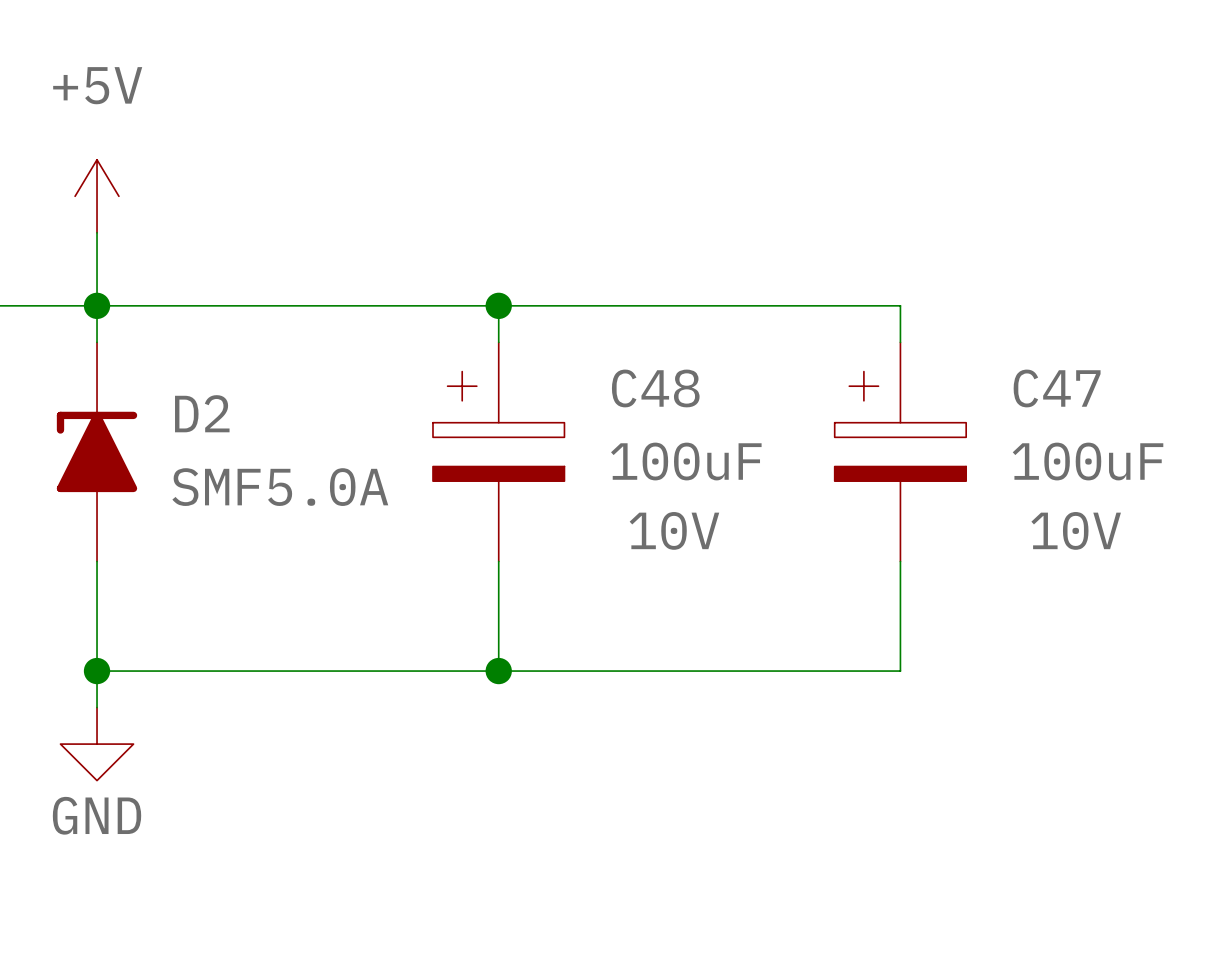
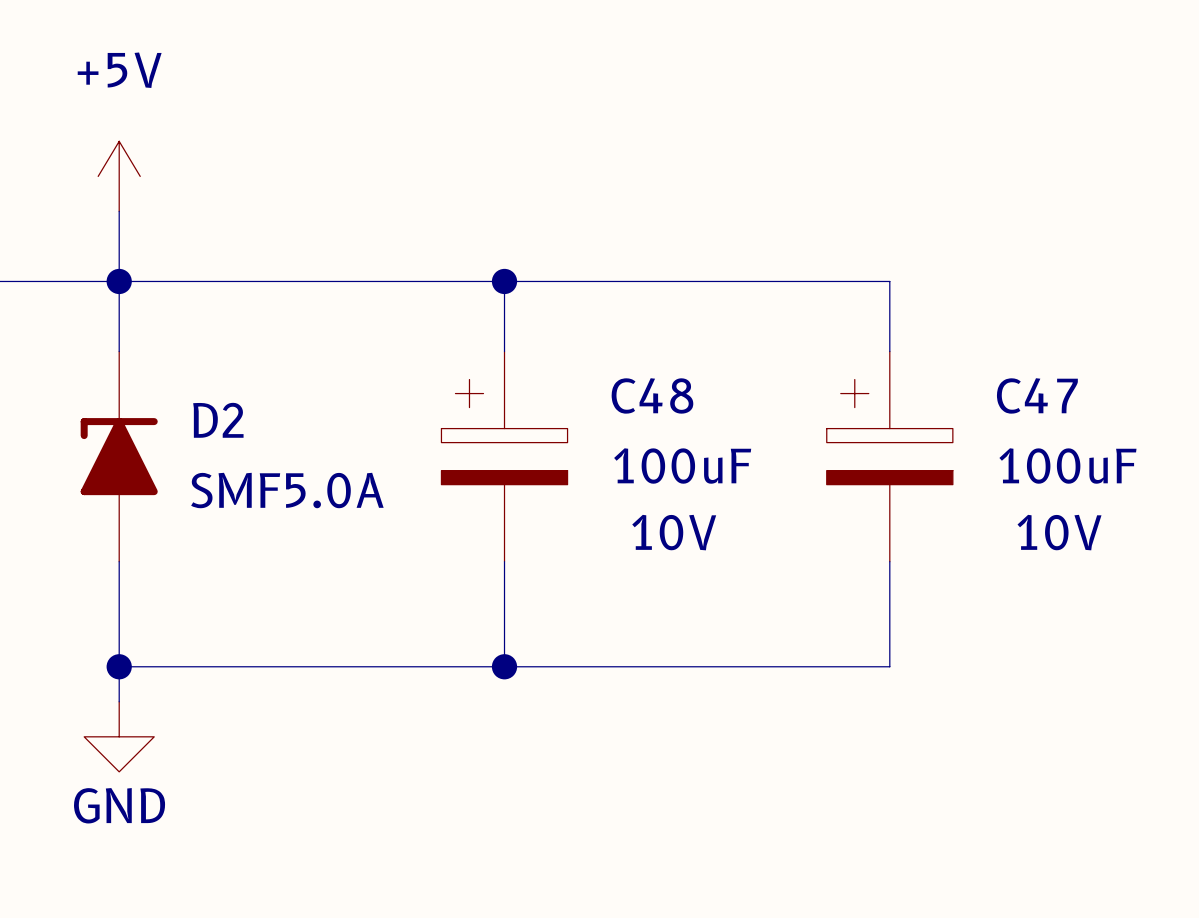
D2 position: (97, 451) -> (119, 456)
C48 position: (498, 451) -> (504, 456)
C47 position: (900, 451) -> (889, 456)
wire: (97, 671) (900, 671) -> (119, 701) (119, 666) (889, 666) (889, 631)
junction position: (97, 671) -> (119, 666)
wire: none -> (504, 631) (504, 666)
junction position: (498, 671) -> (504, 666)
power symbol position: GND (97, 744) -> GND (119, 736)

